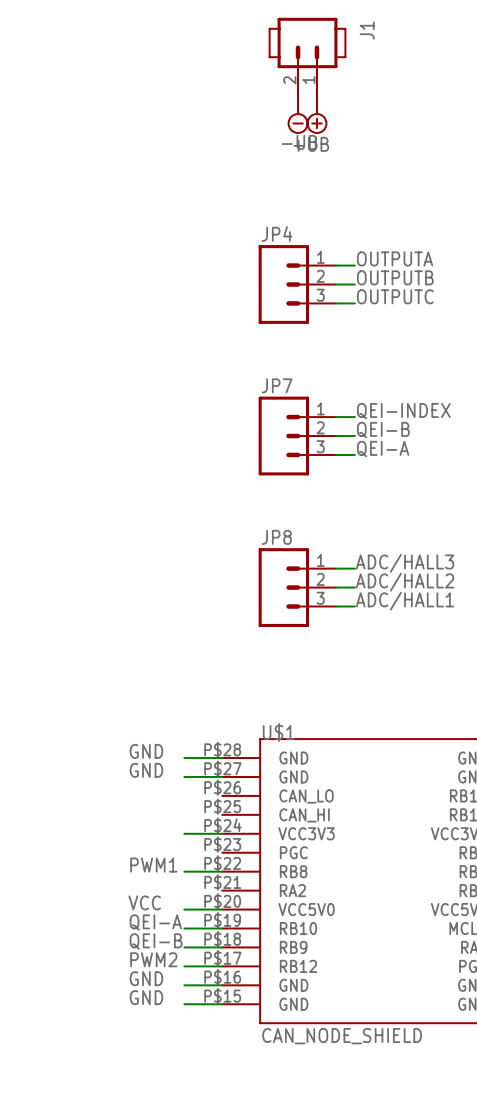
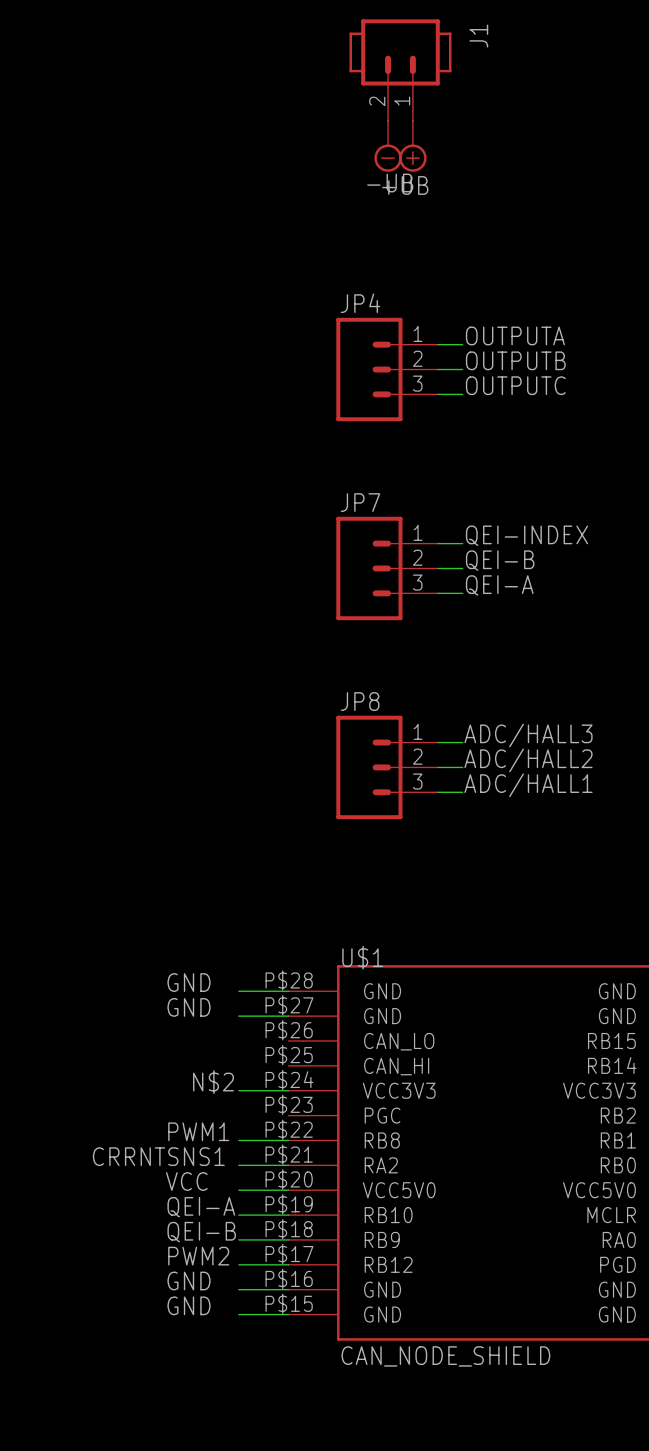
label: none -> N$2 (213, 1082)
label: none -> CRRNTSNS1 (158, 1156)
wire: none -> (238, 1165) (288, 1165)

